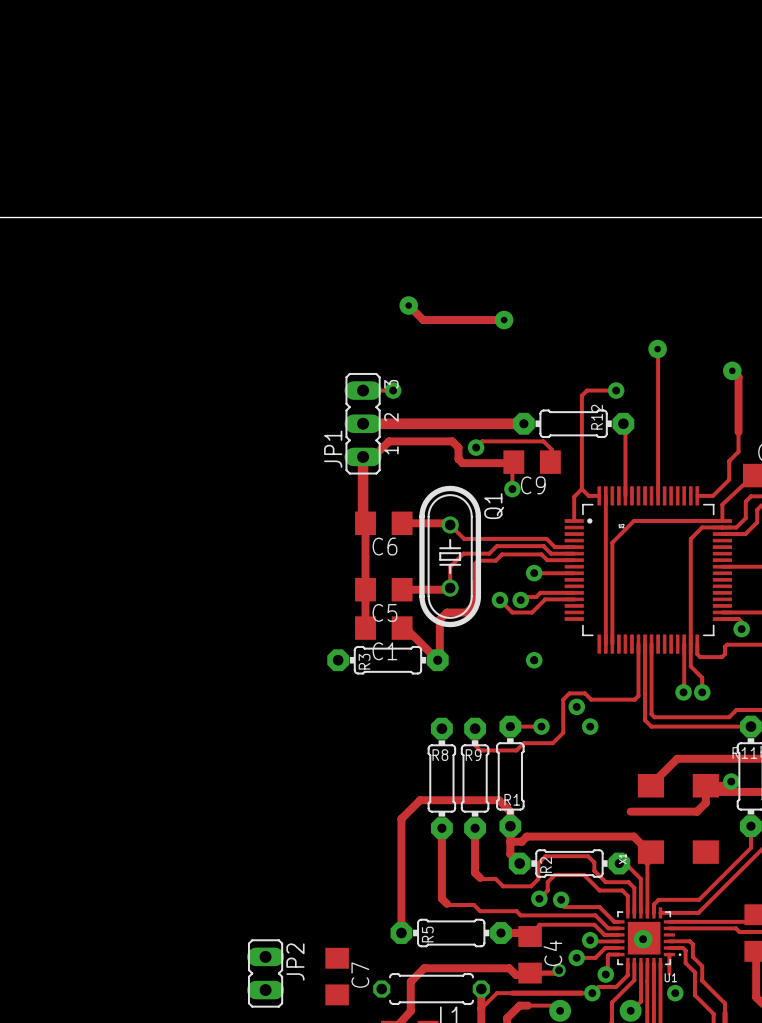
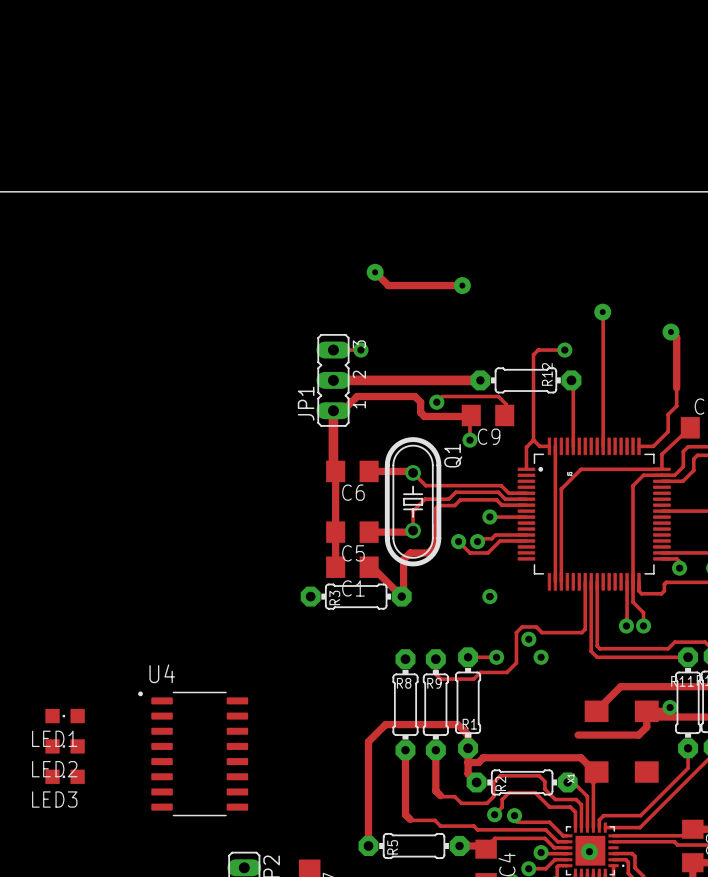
LED1: none -> (65, 716)
LED2: none -> (65, 746)
U4: none -> (193, 753)
LED3: none -> (65, 776)

